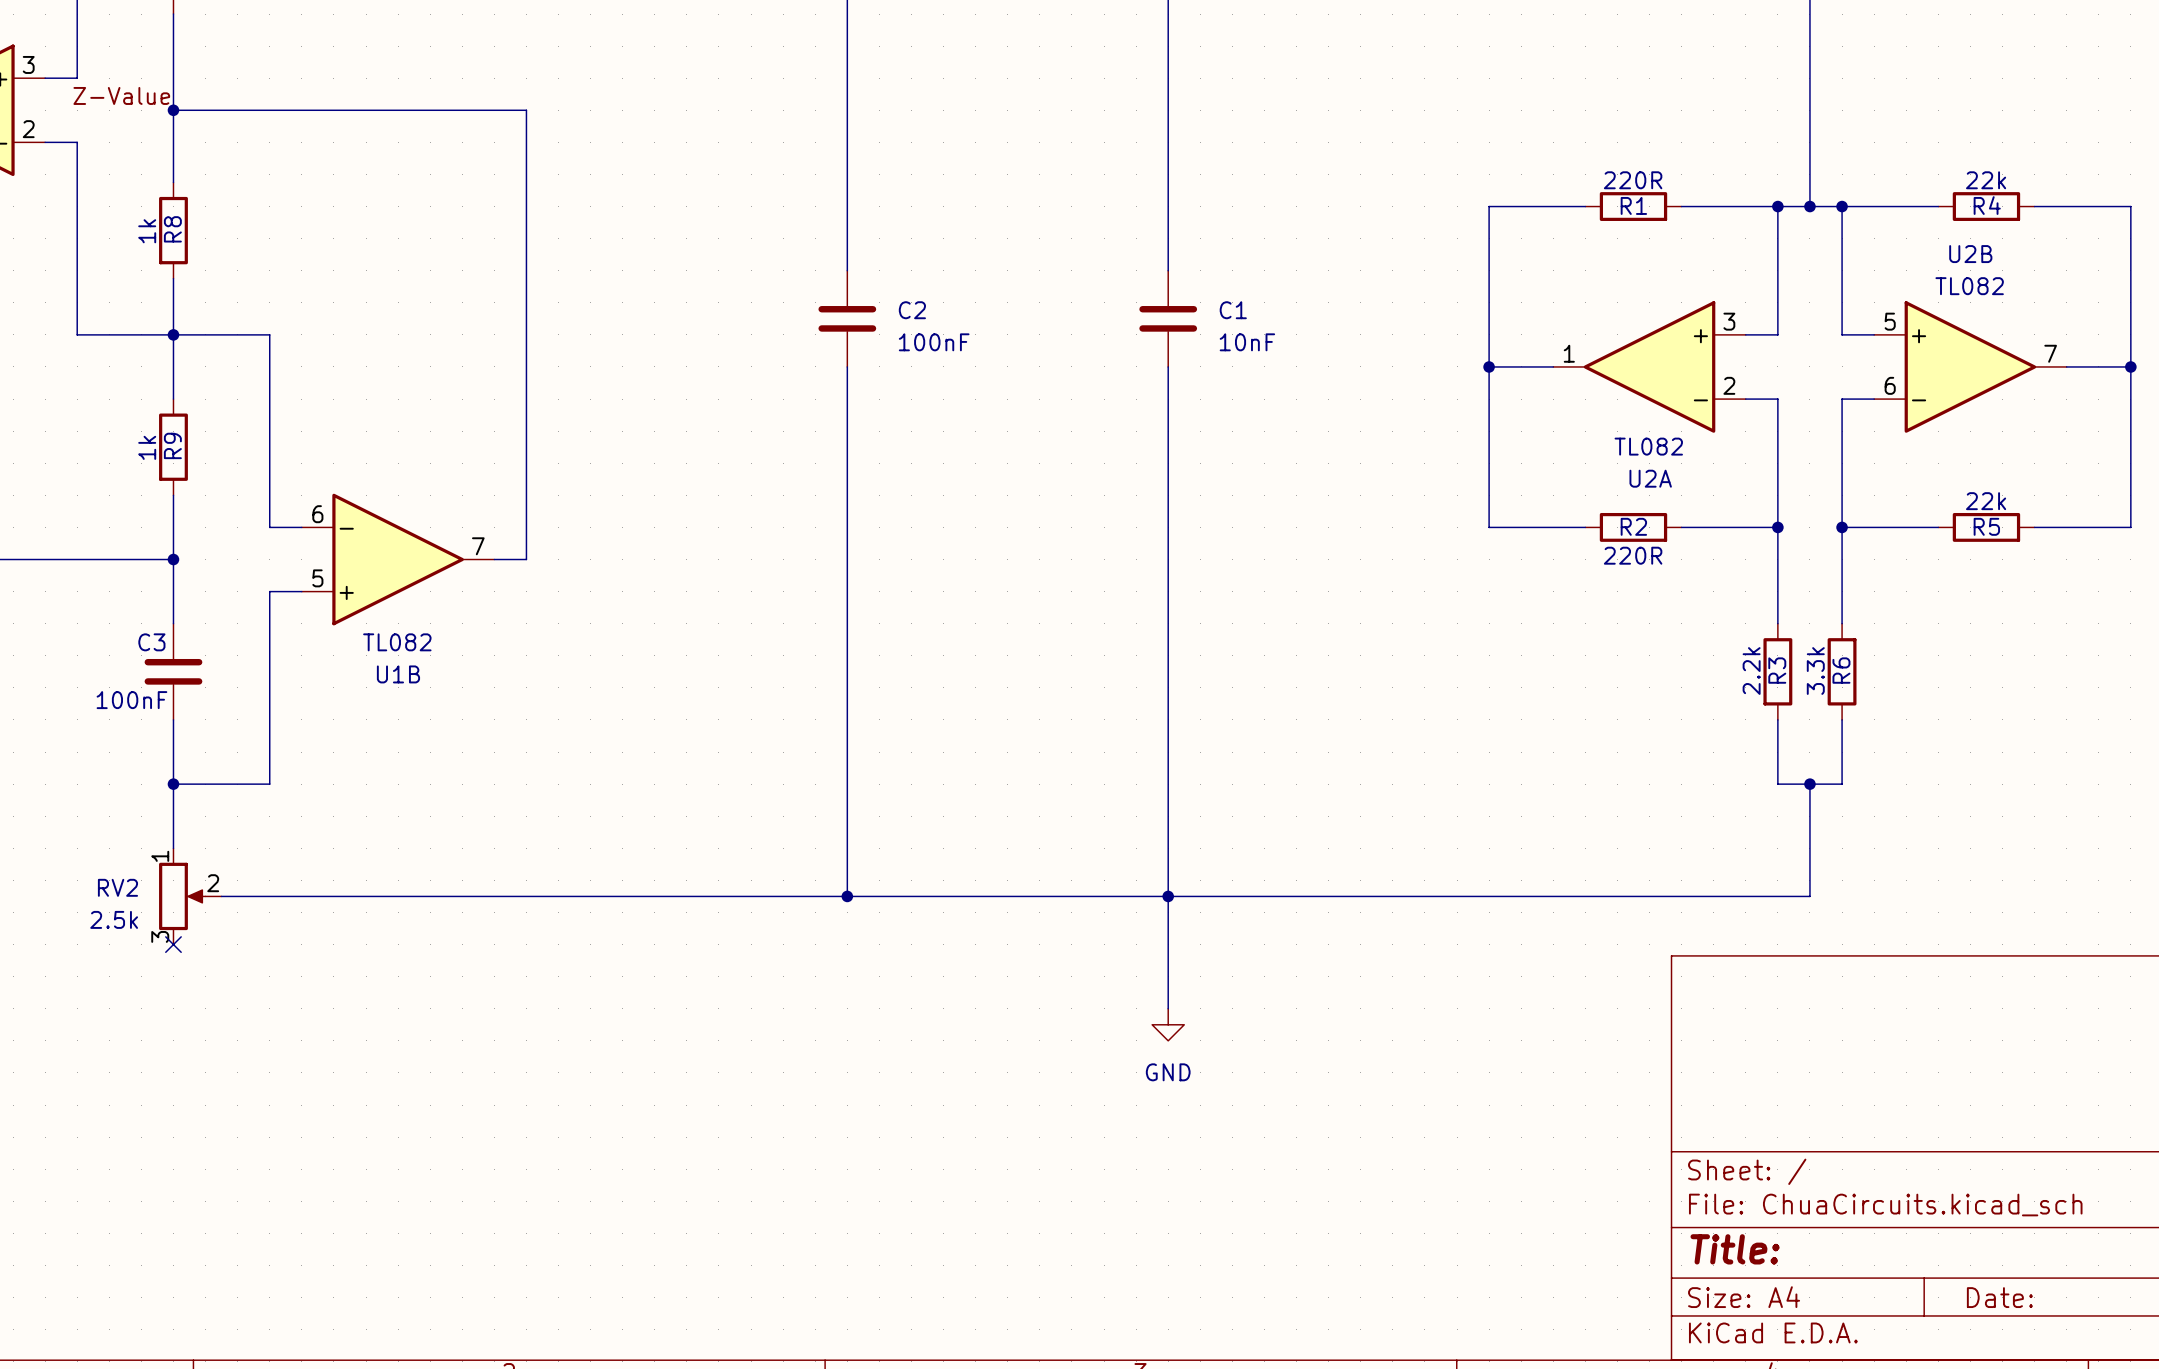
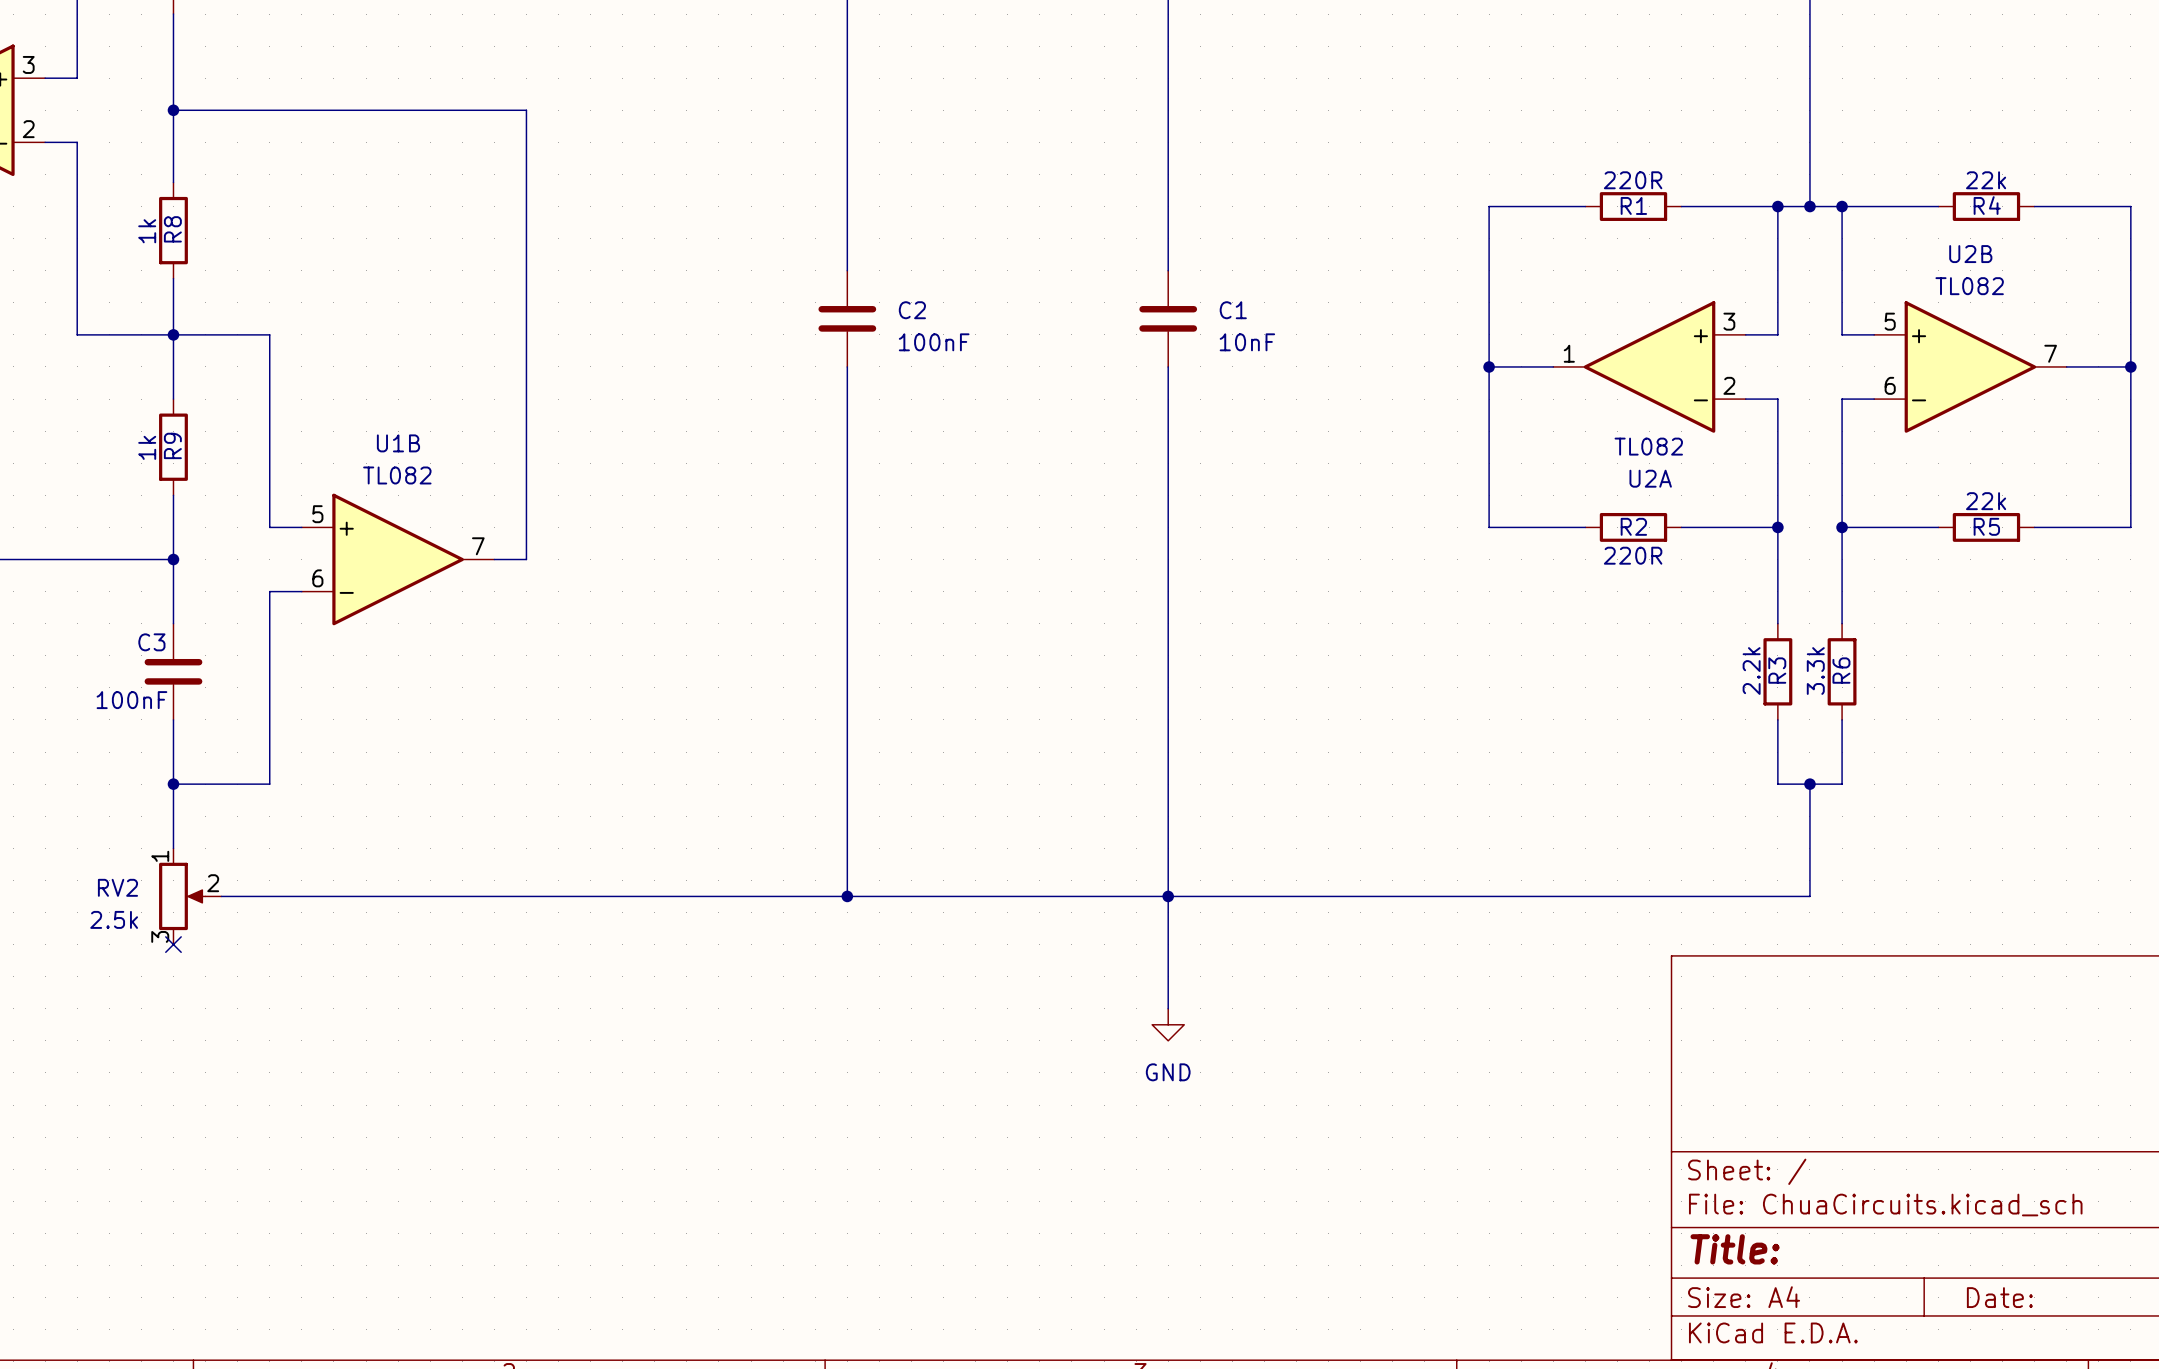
label: Z-Value (121, 95) -> none
U1B flip: as is (398, 559) -> up-down (398, 559)

